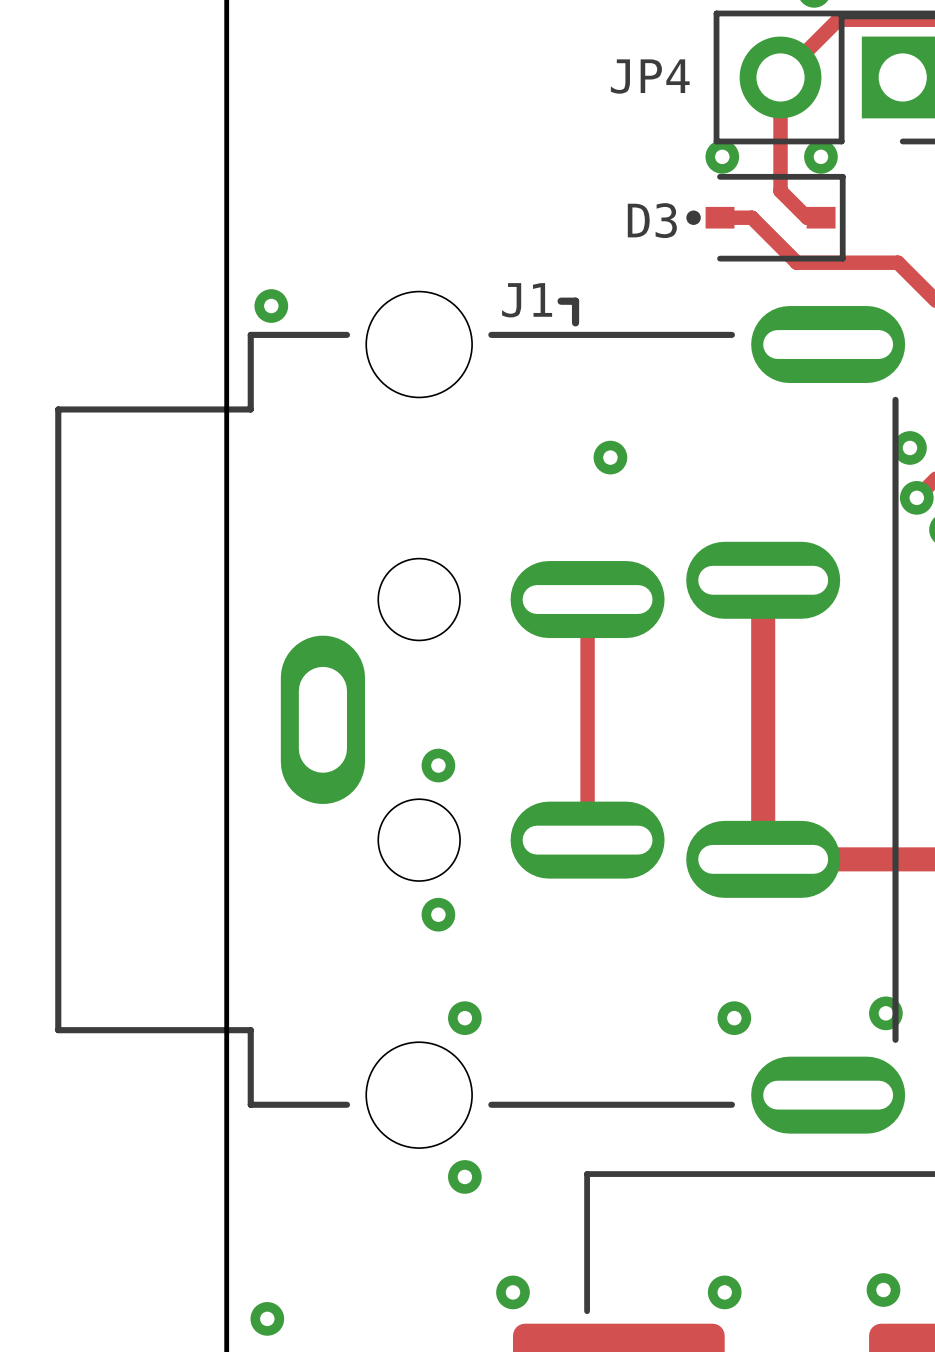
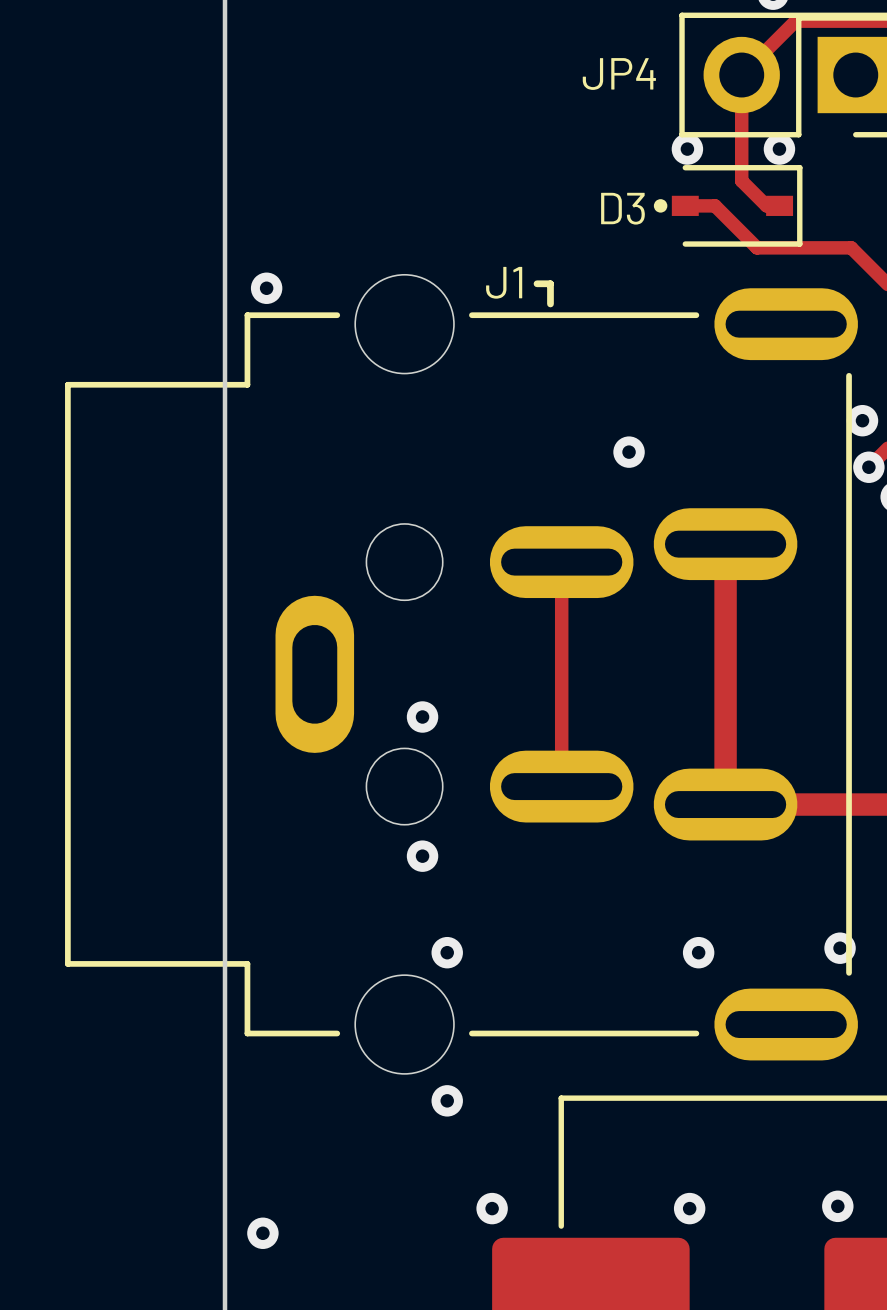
via position: (610, 457) -> (629, 452)

